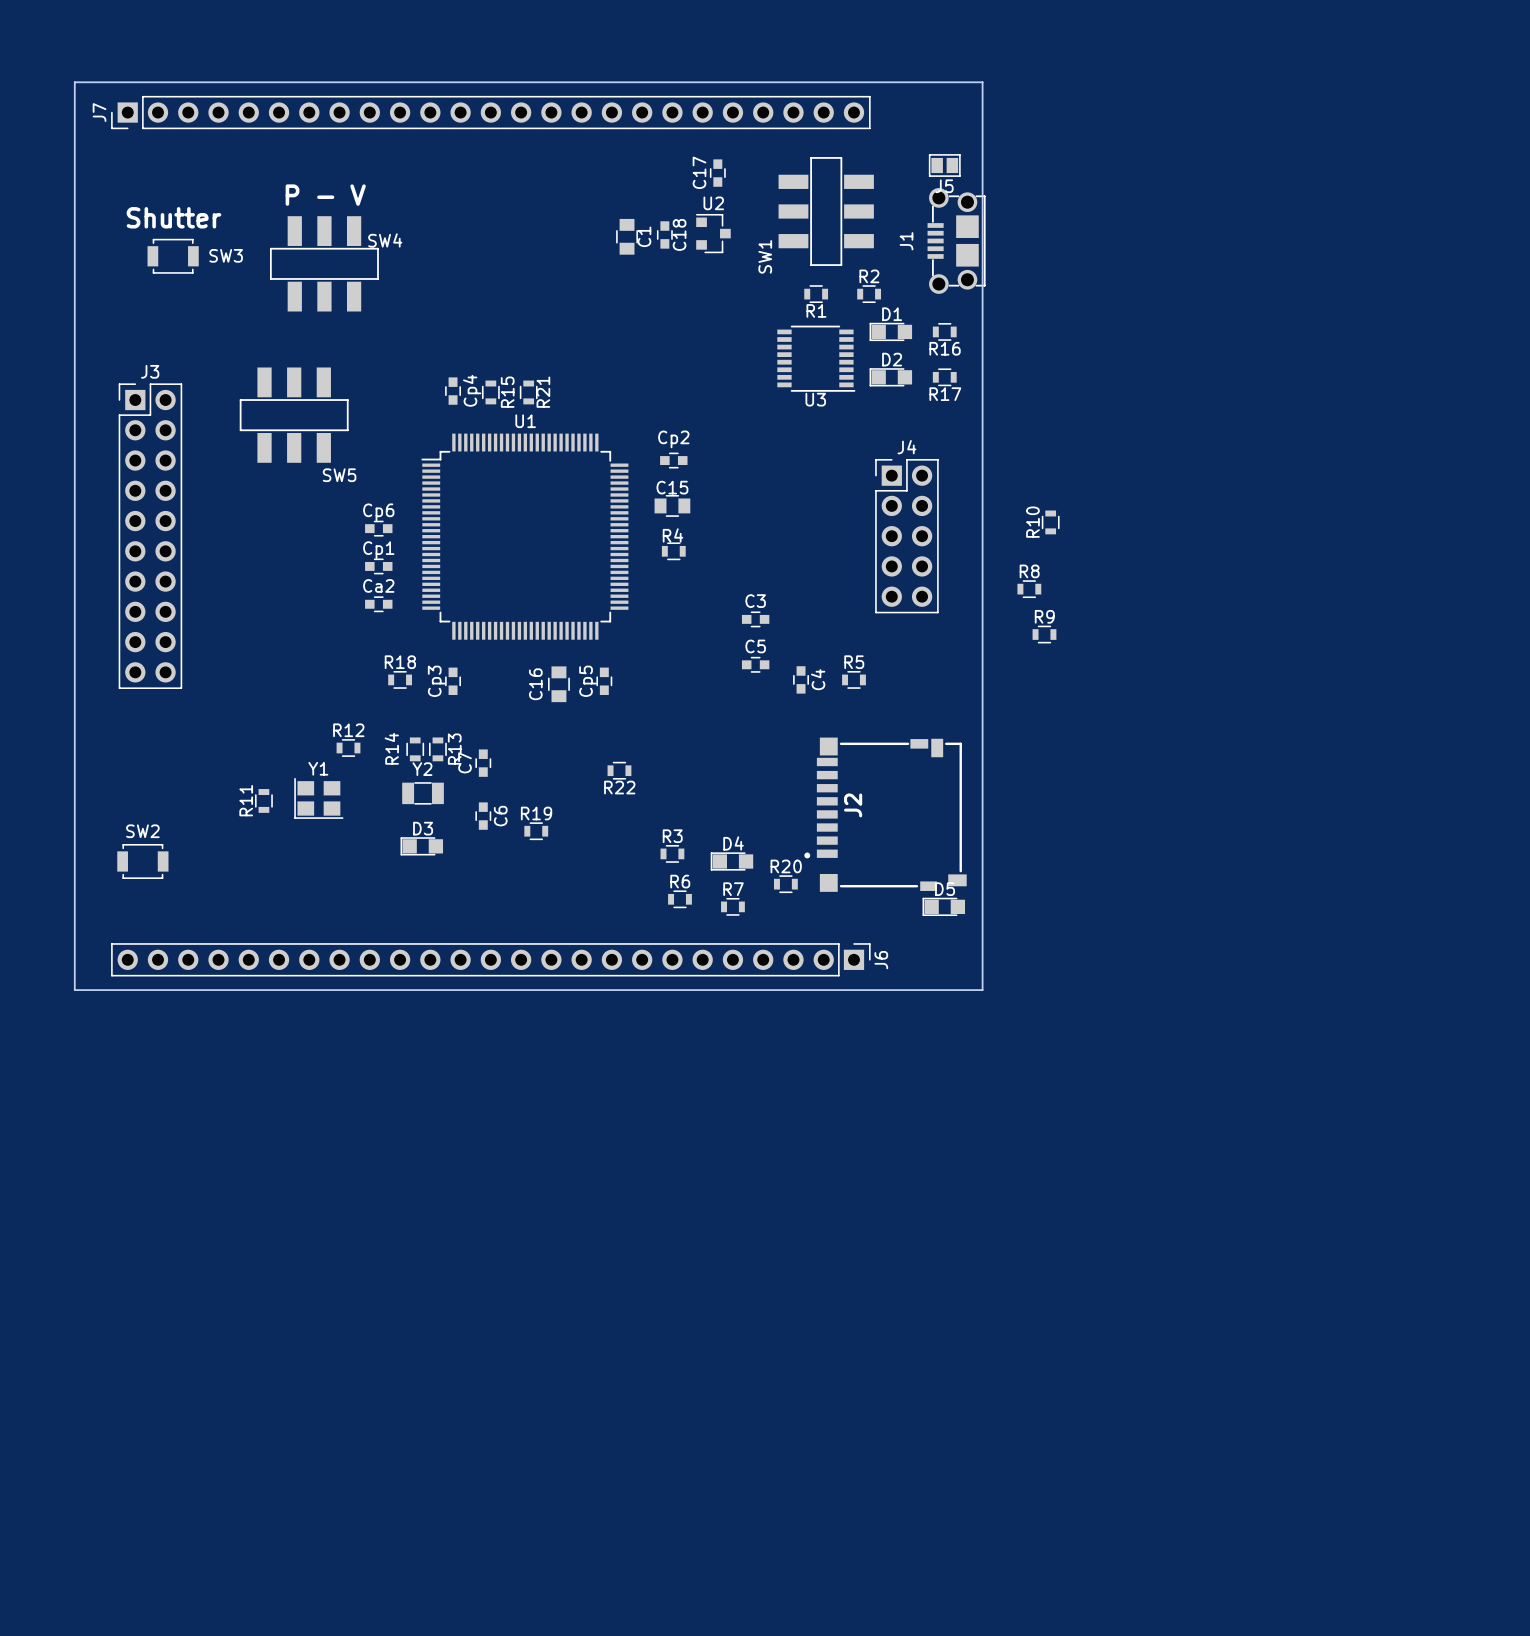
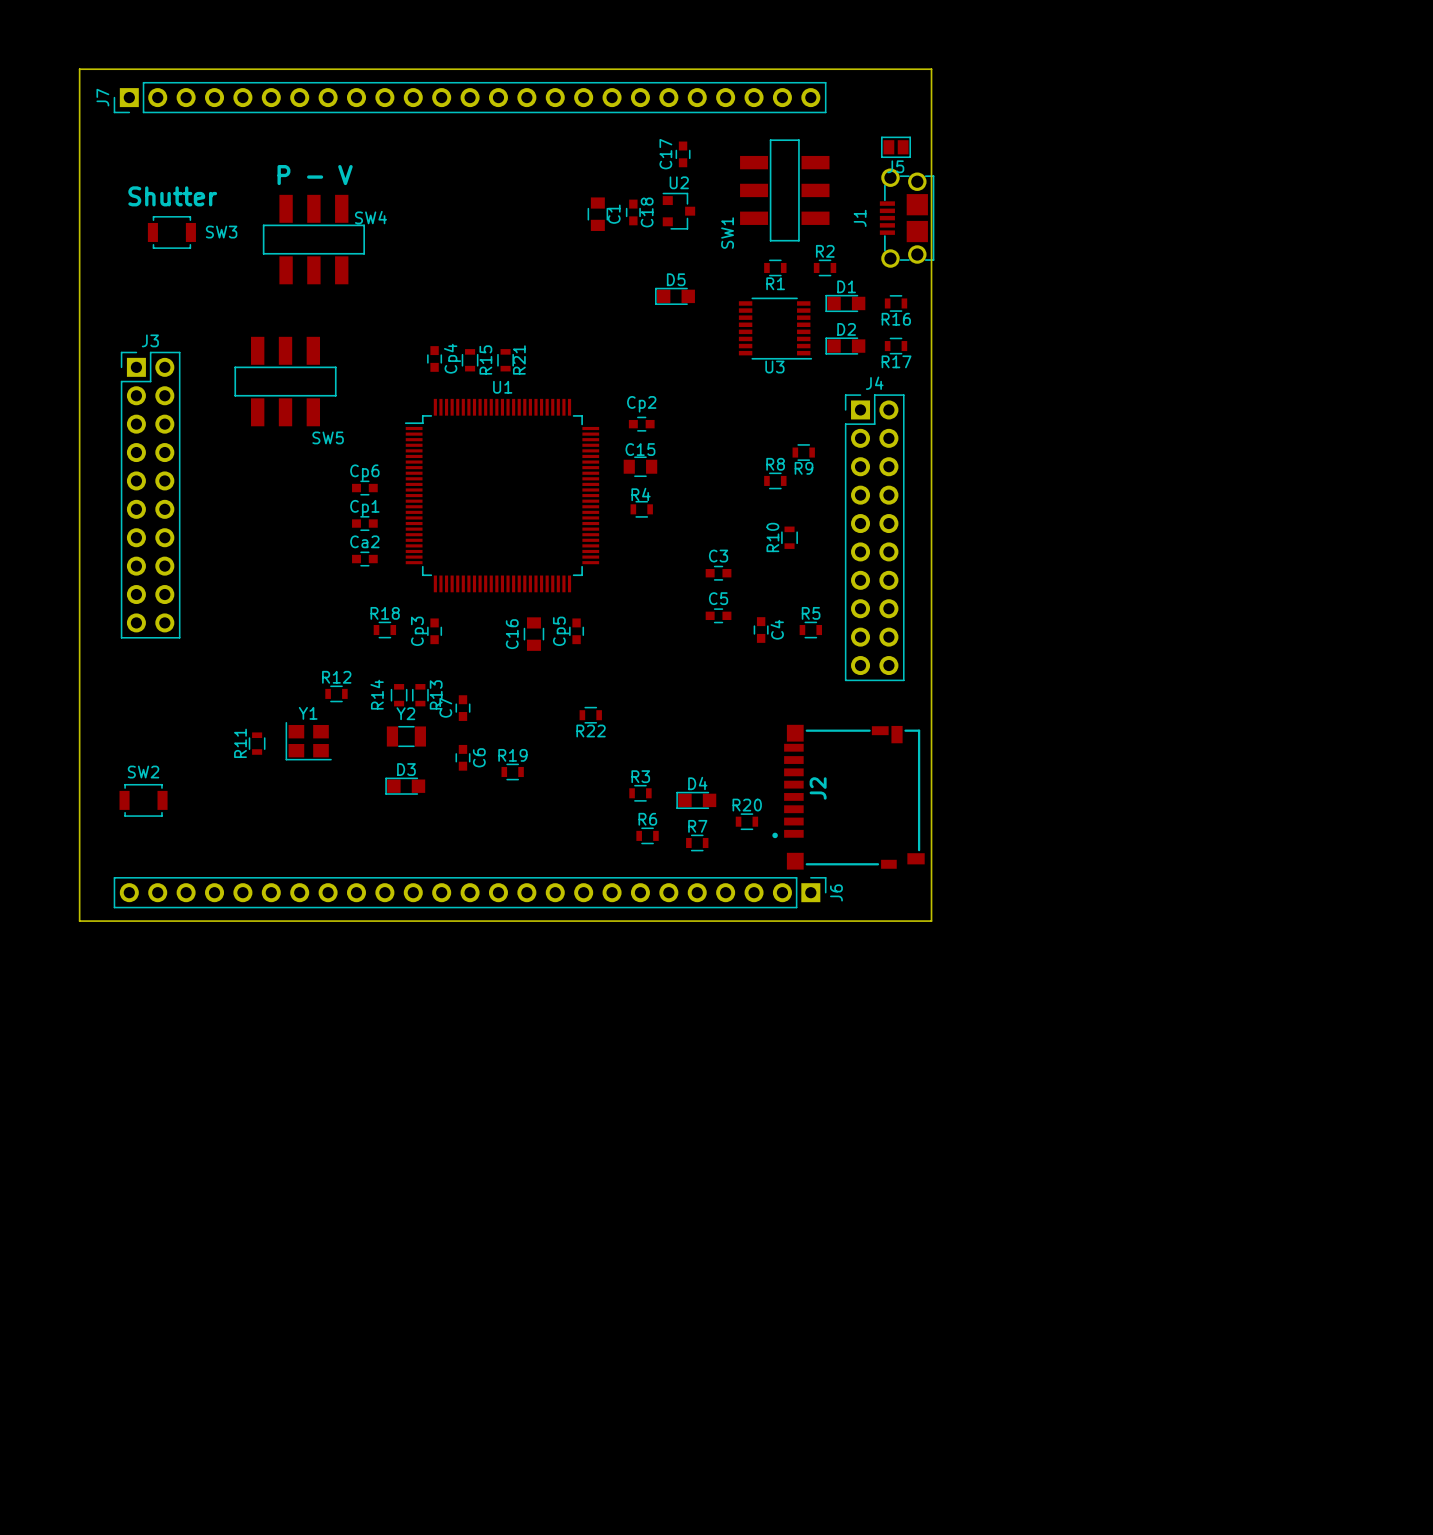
J4 name position: J4 (906, 447) -> J4 (874, 383)
J4 footprint: [875, 459, 939, 614] -> [844, 394, 905, 682]
R10 position: (1050, 522) -> (789, 537)
R8 position: (1029, 589) -> (775, 480)
R9 name position: R9 (1044, 616) -> R9 (803, 468)
R9 position: (1044, 634) -> (803, 452)
J2 position: (885, 814) -> (848, 797)
D5 position: (943, 906) -> (675, 296)

